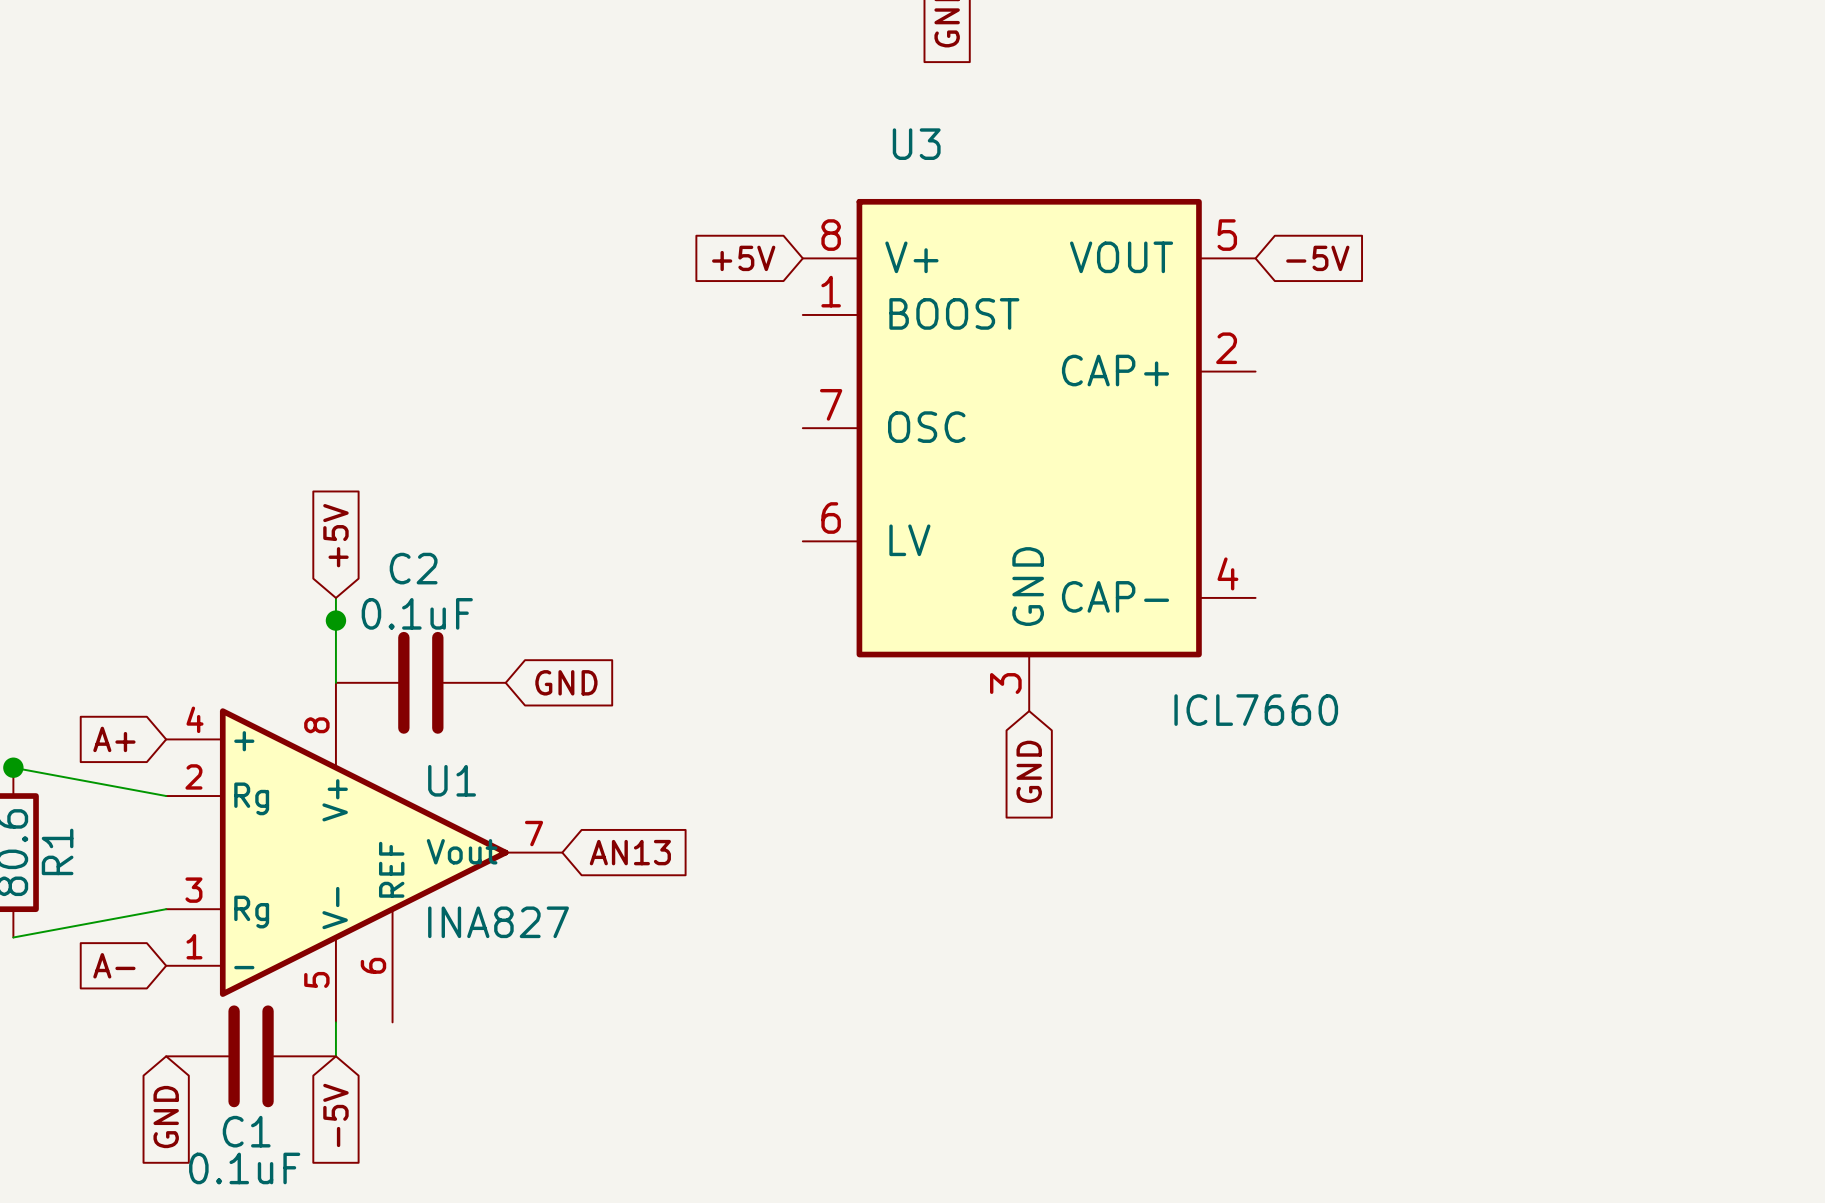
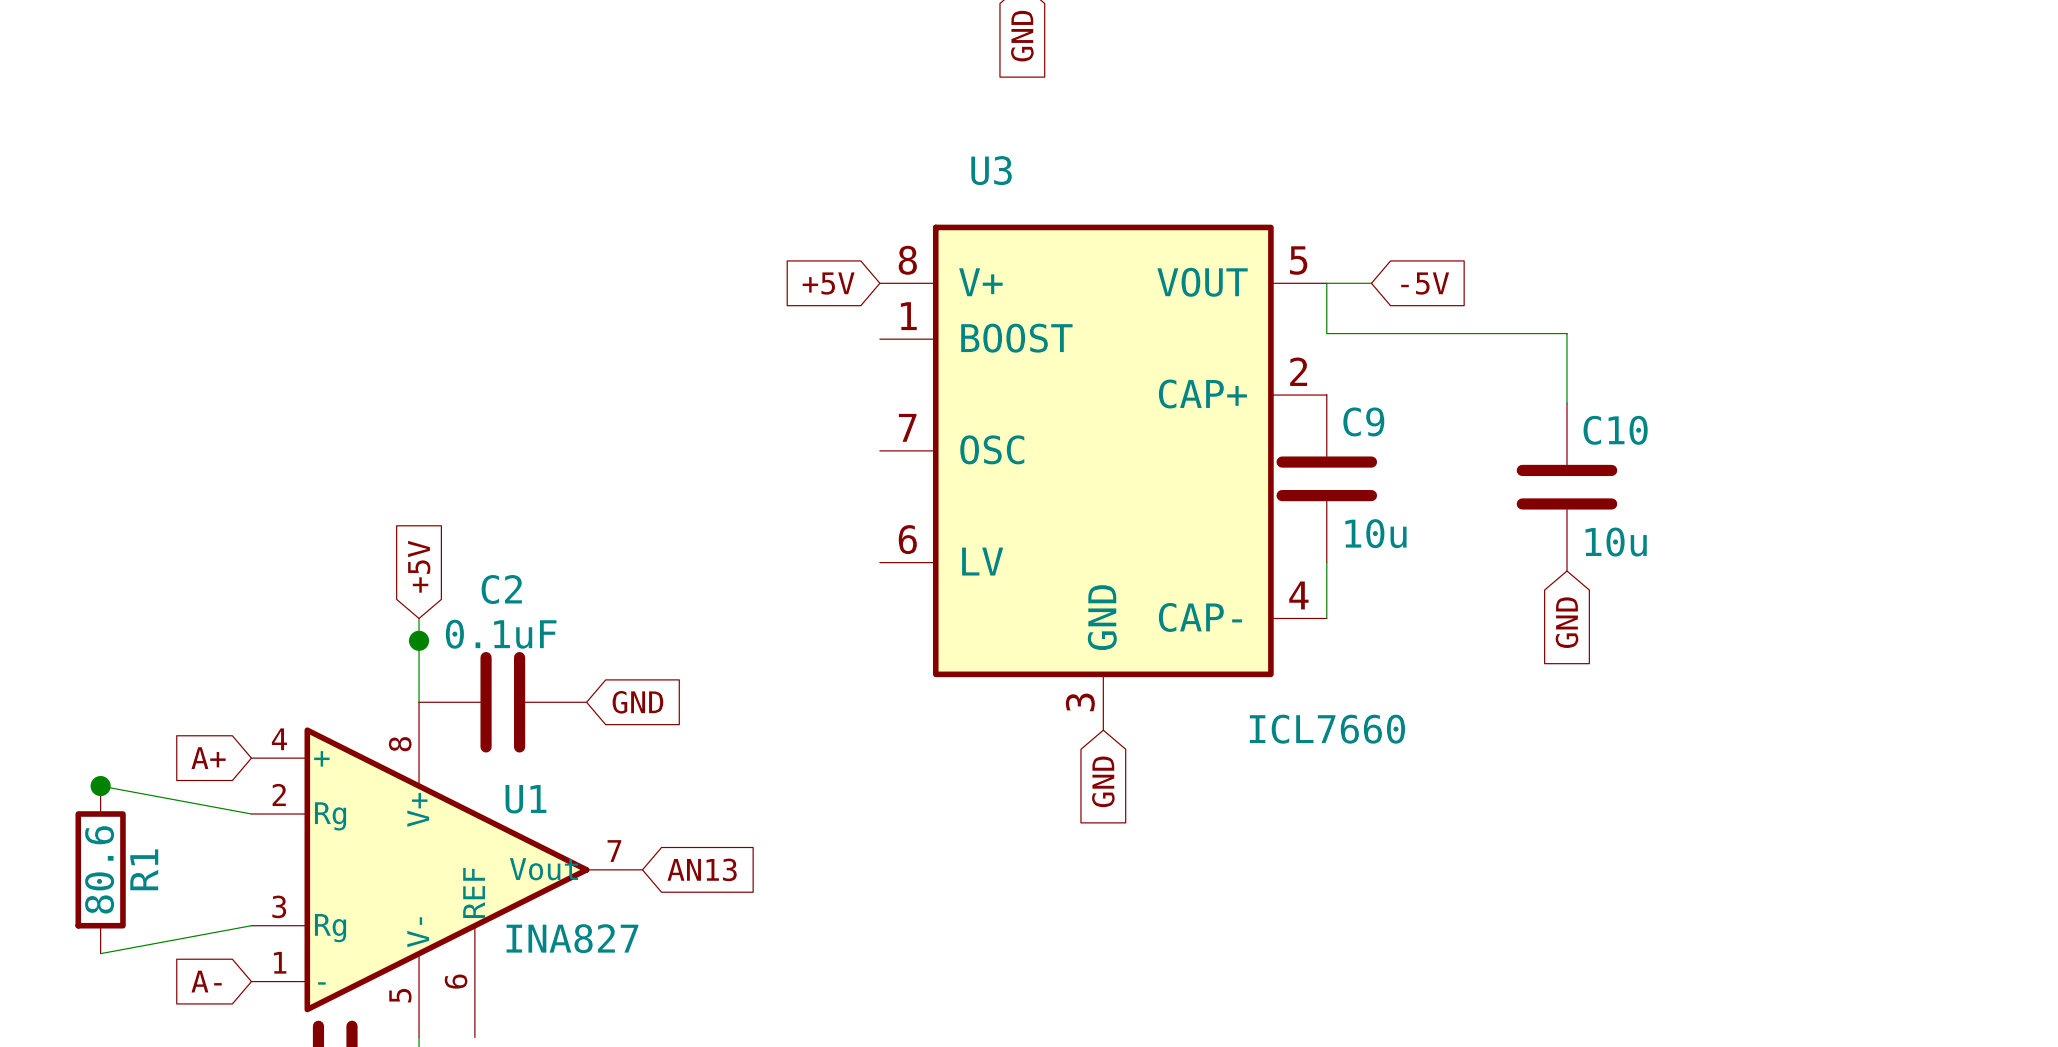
wire: none -> (1371, 283) (1326, 283) (1326, 333) (1566, 333) (1566, 403)
global label position: -5V (1317, 258) -> -5V (1425, 283)
C9: none -> 10u (1326, 478)
C10: none -> 10u (1566, 487)
wire: none -> (1326, 562) (1326, 618)
global label: none -> GND (1567, 622)

